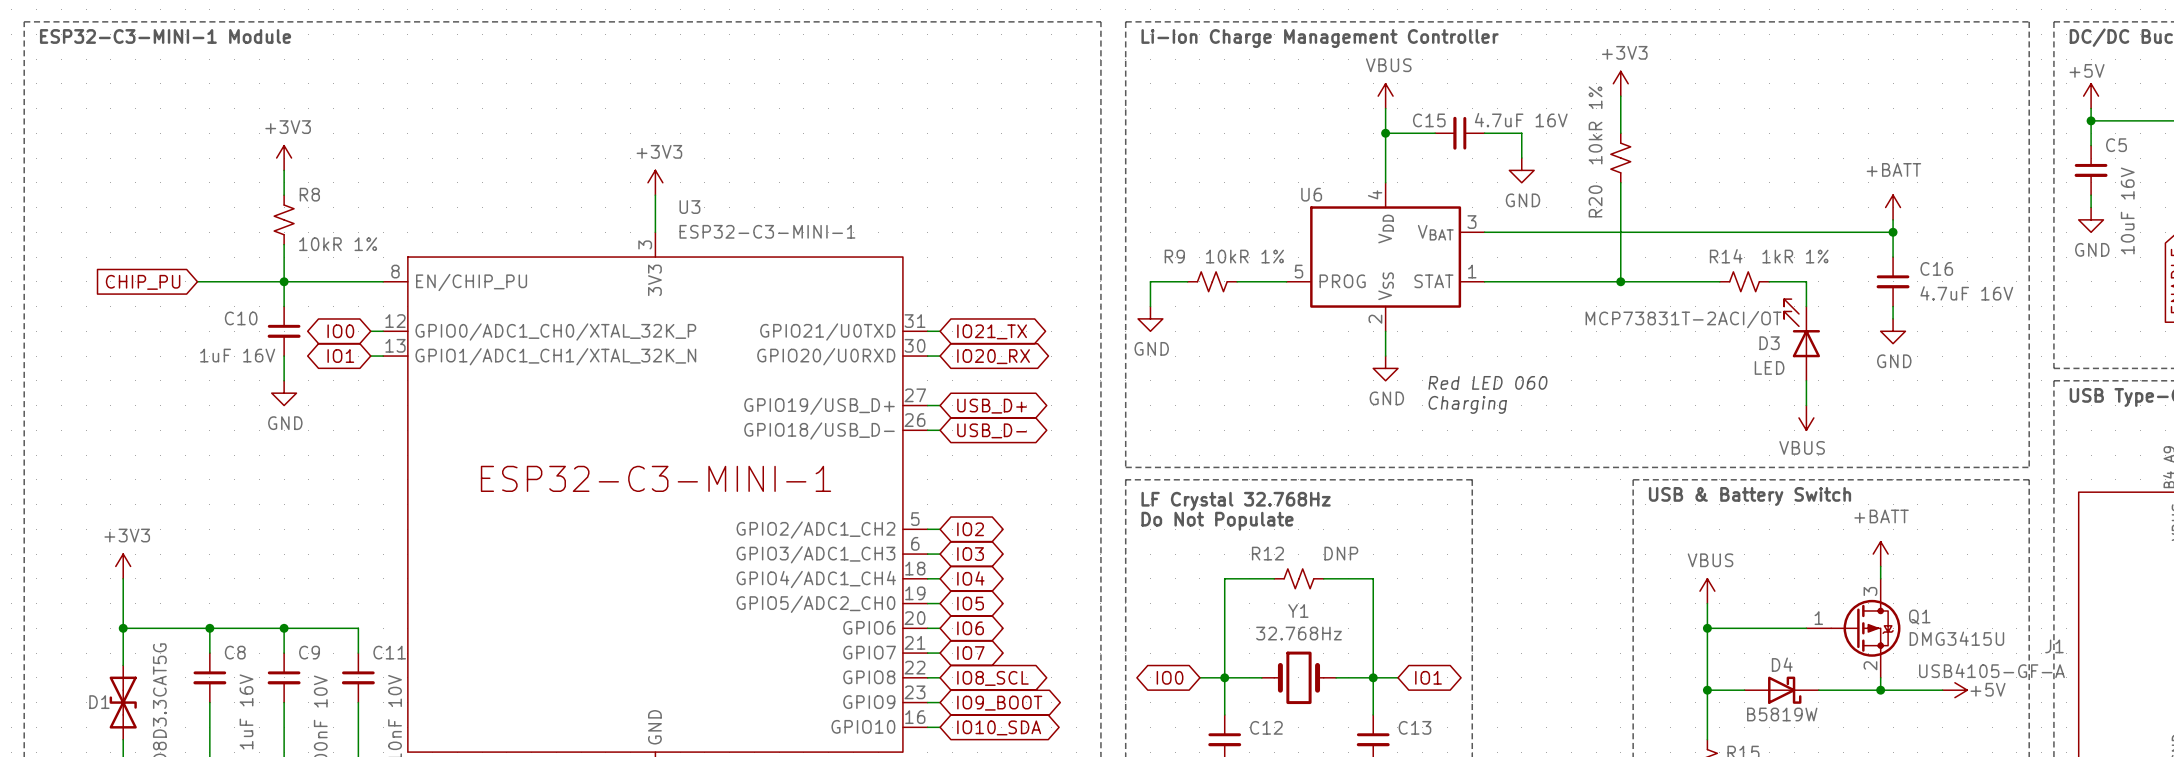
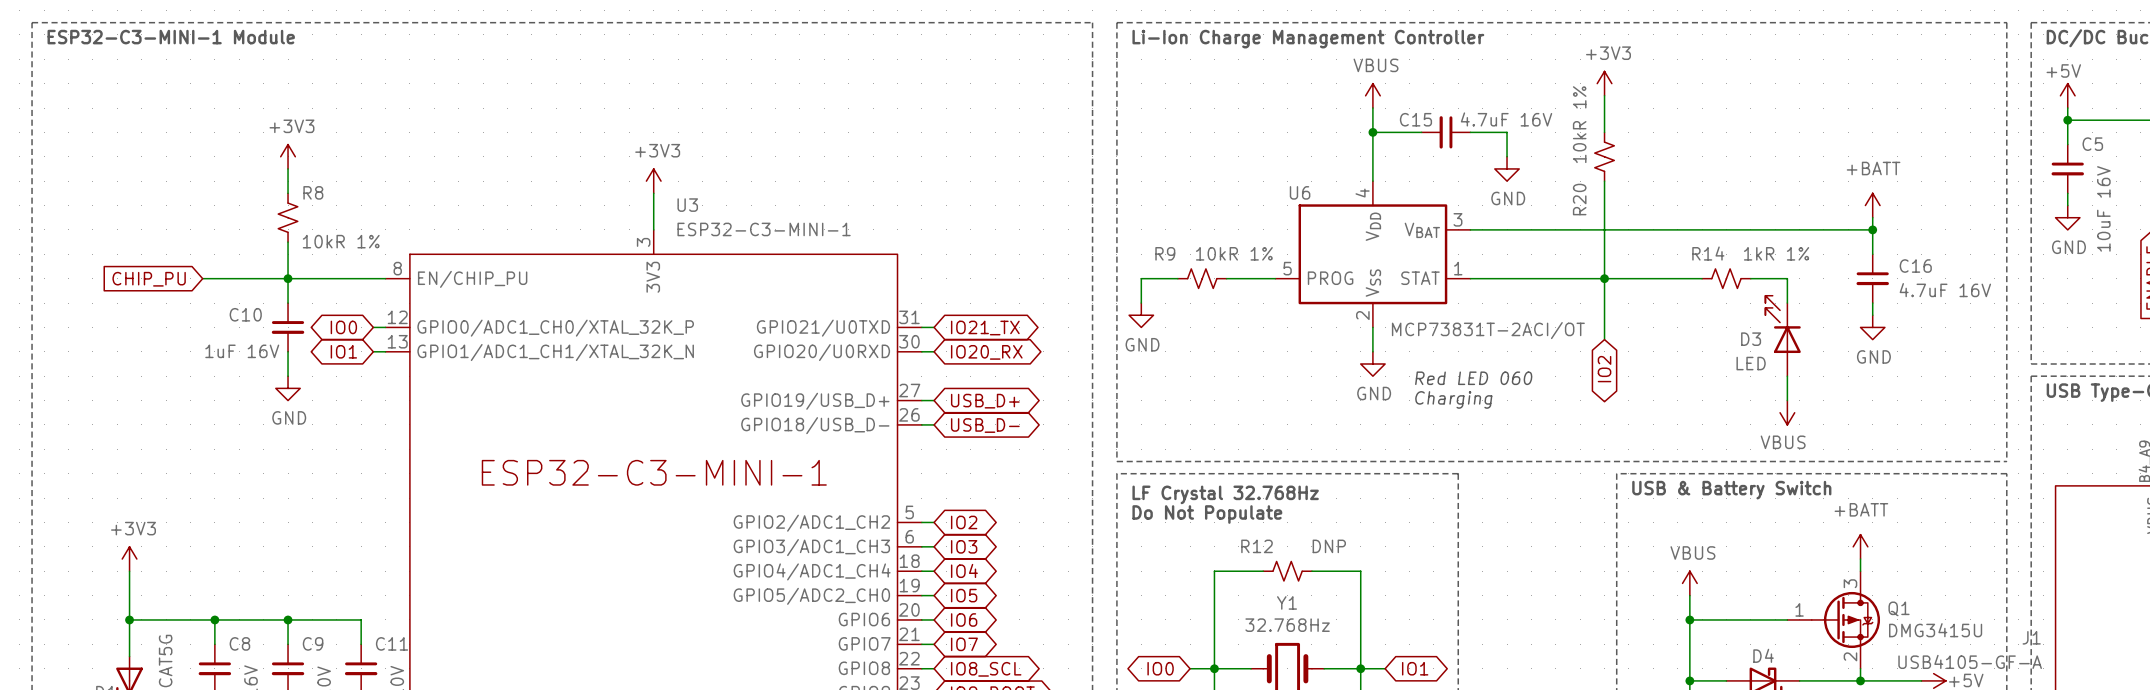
wire: none -> (1604, 278) (1604, 339)
U6 value position: MCP73831T-2ACI/OT (1683, 319) -> MCP73831T-2ACI/OT (1488, 330)
global label: none -> IO2 (1604, 369)

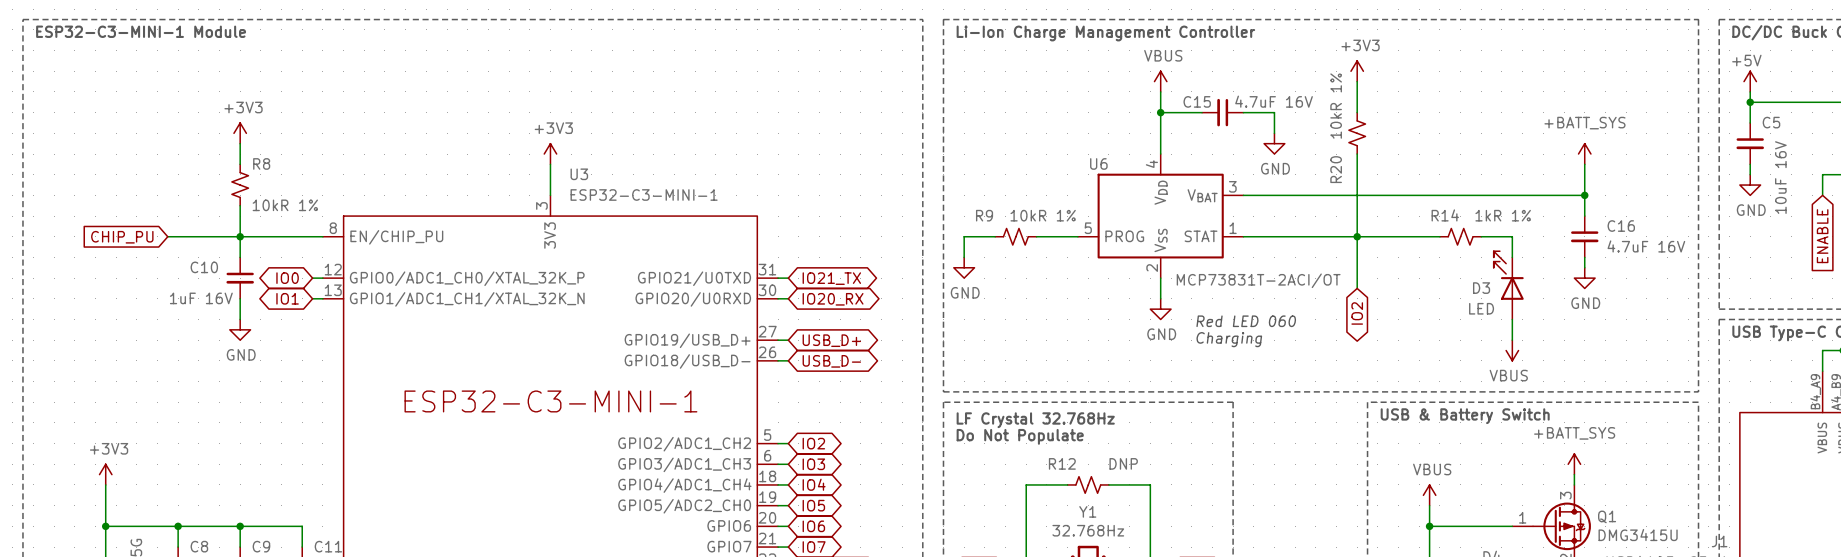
power symbol: none -> +BATT_SYS (1584, 154)
power symbol: +BATT (1872, 205) -> none
power symbol: +BATT (1860, 546) -> +BATT_SYS (1574, 464)

